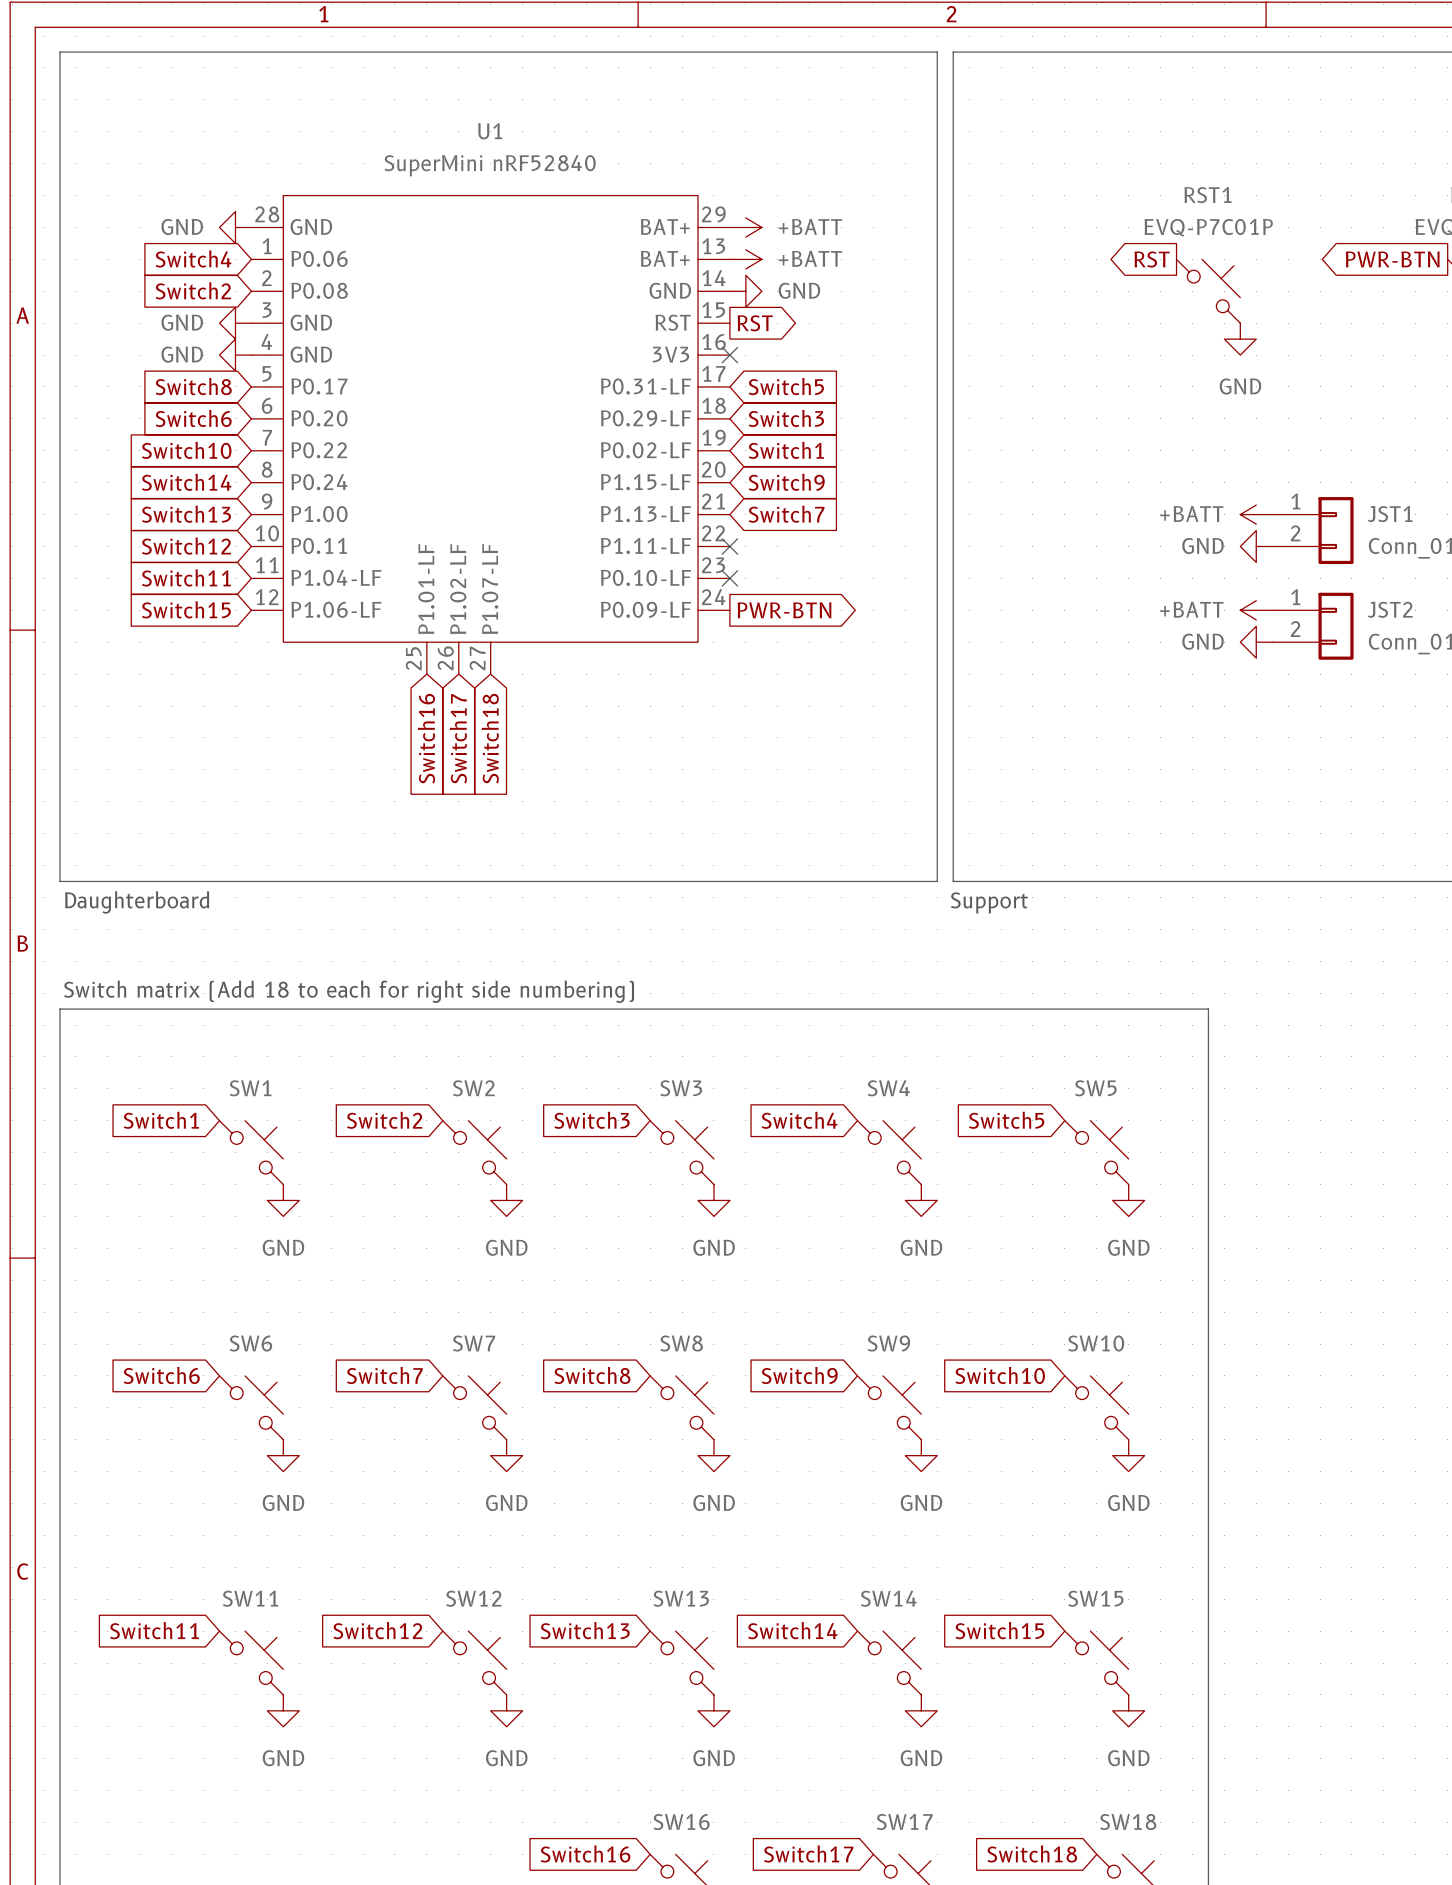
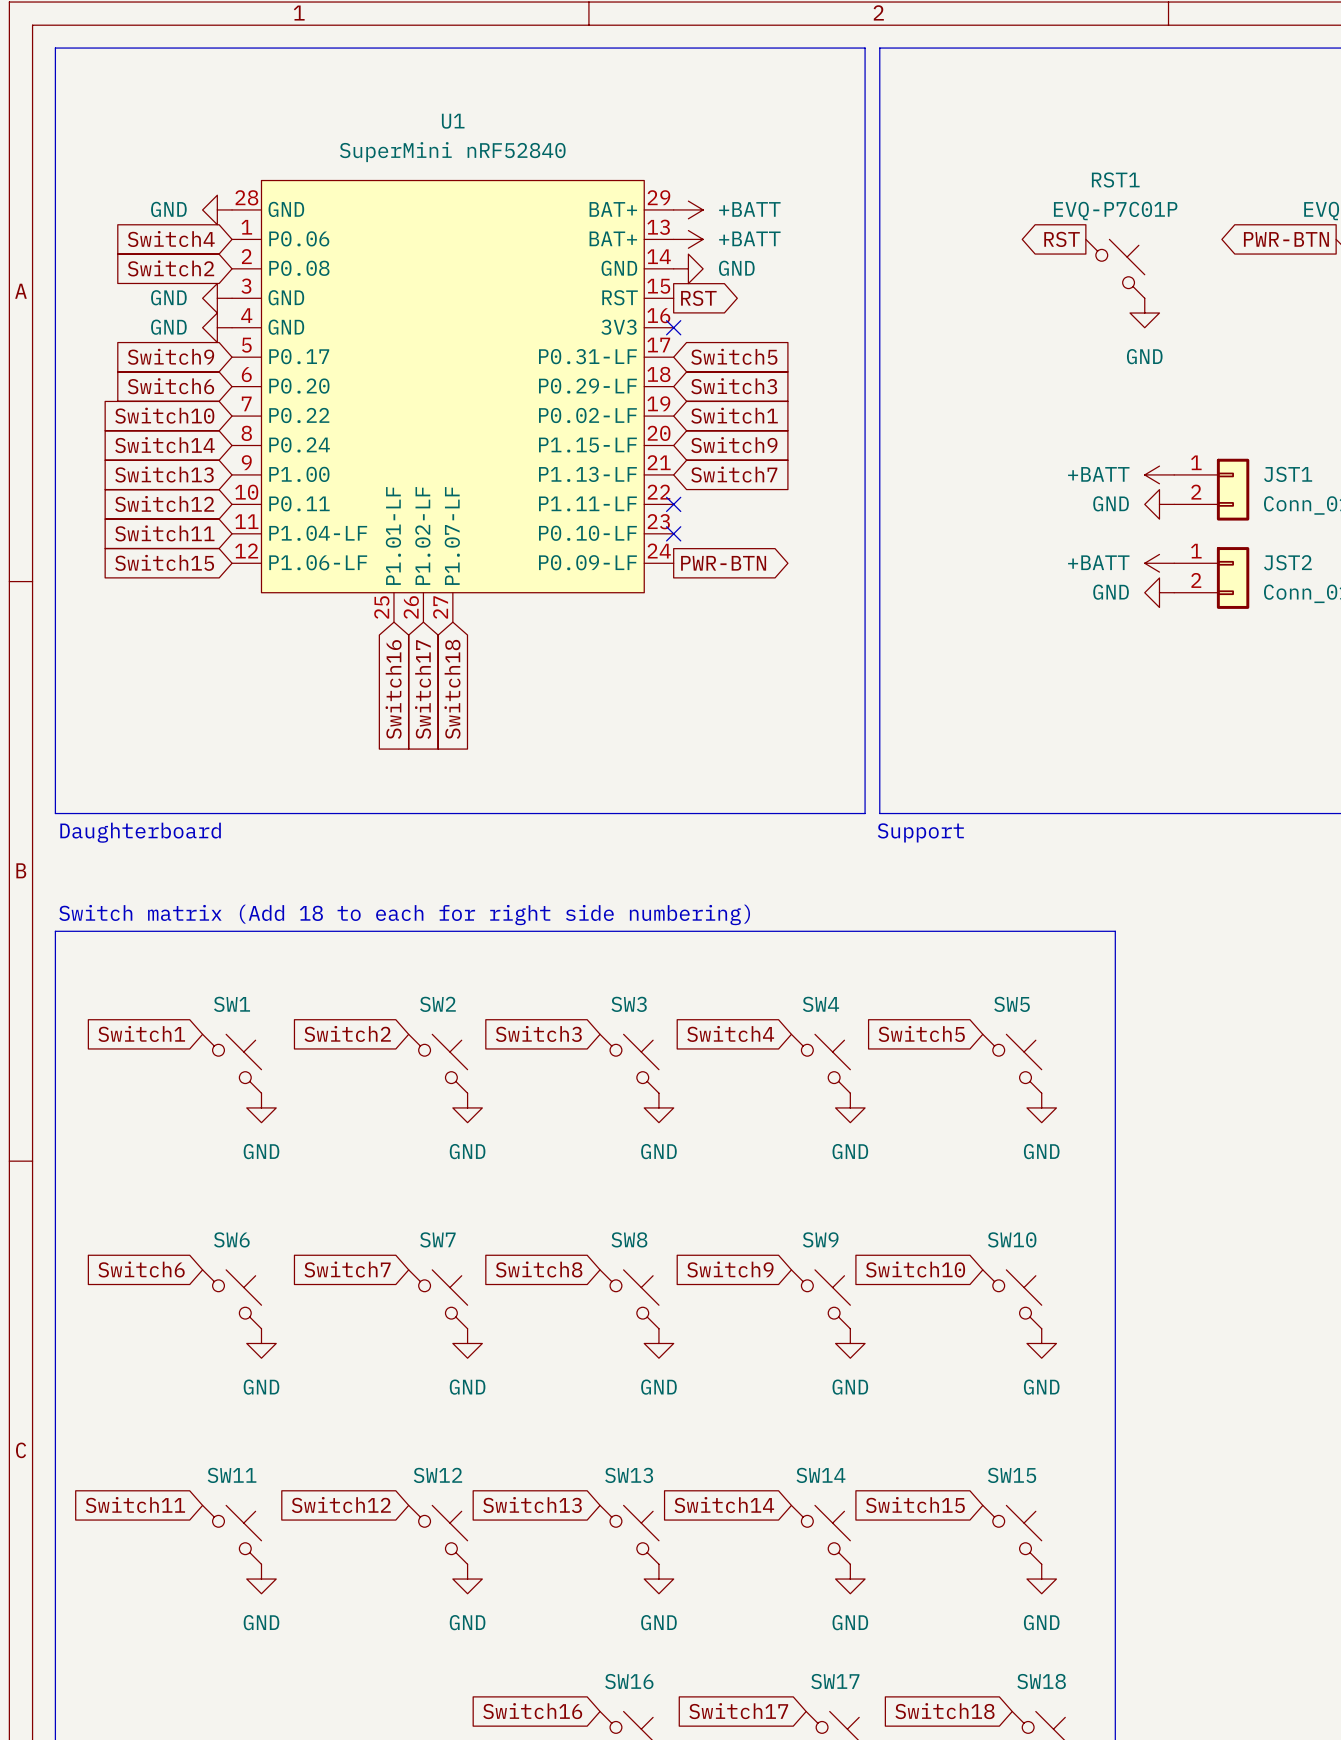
global label: Switch8 (193, 386) -> Switch9 (170, 356)

